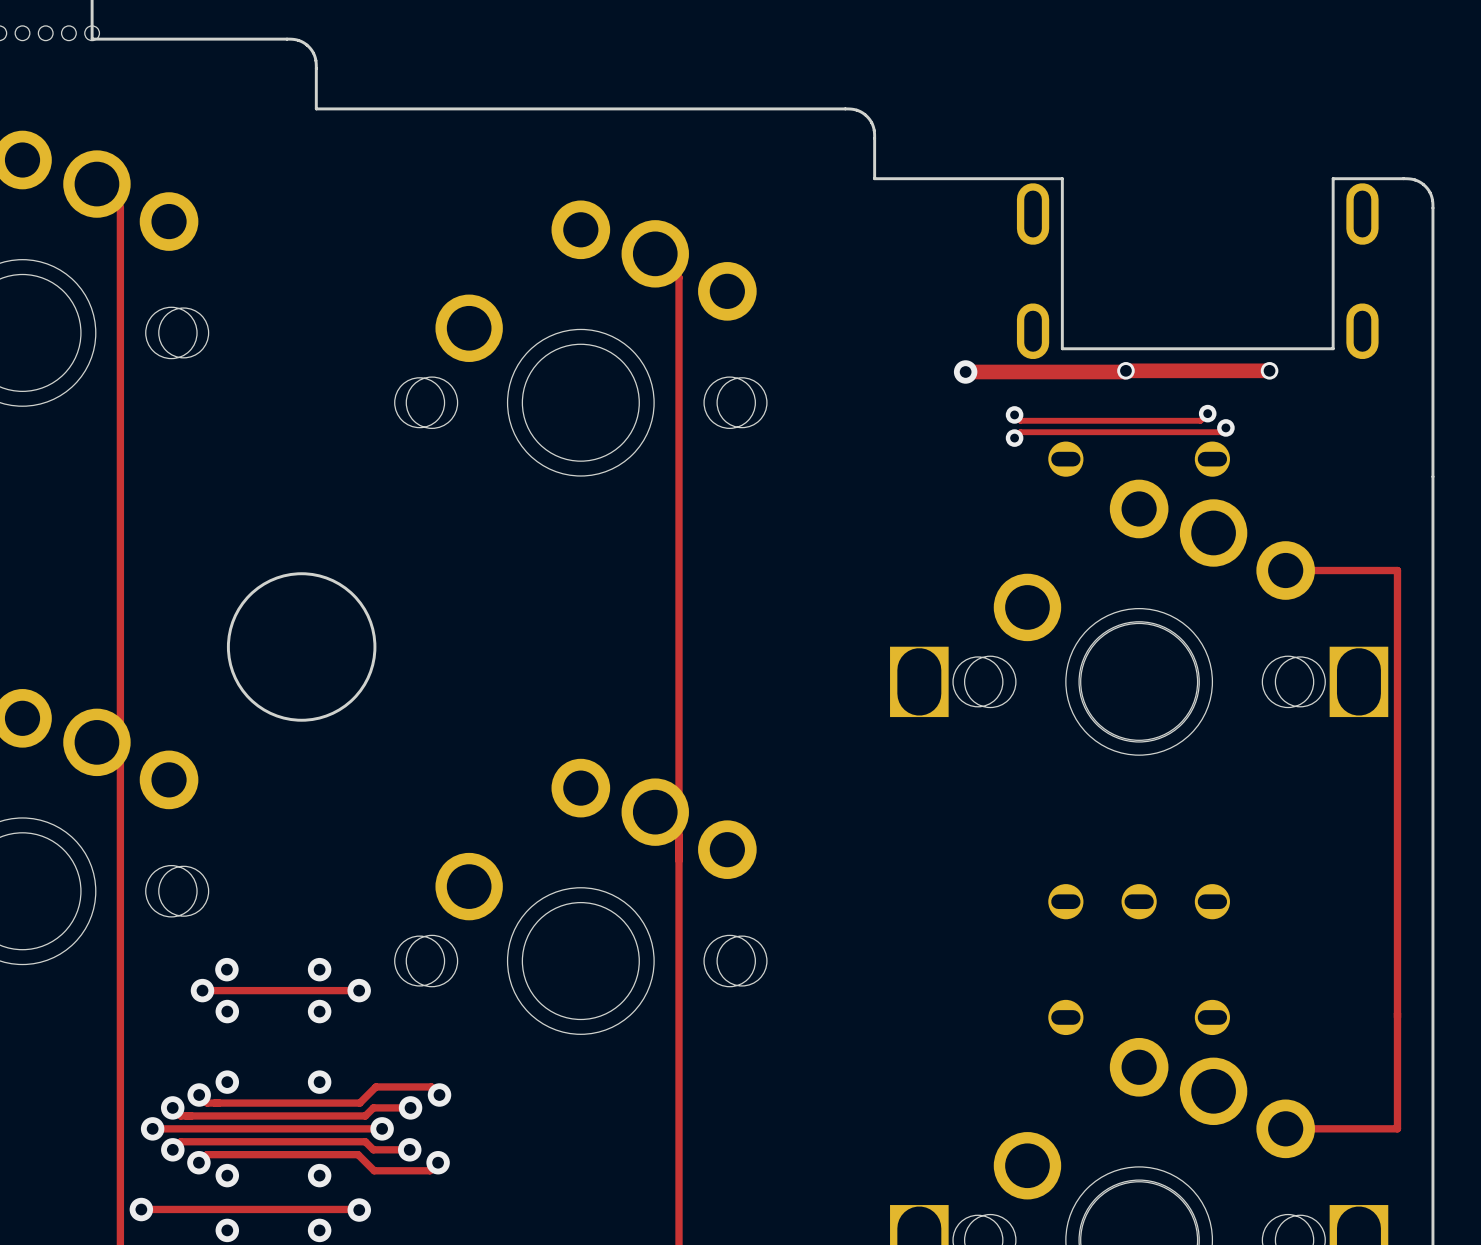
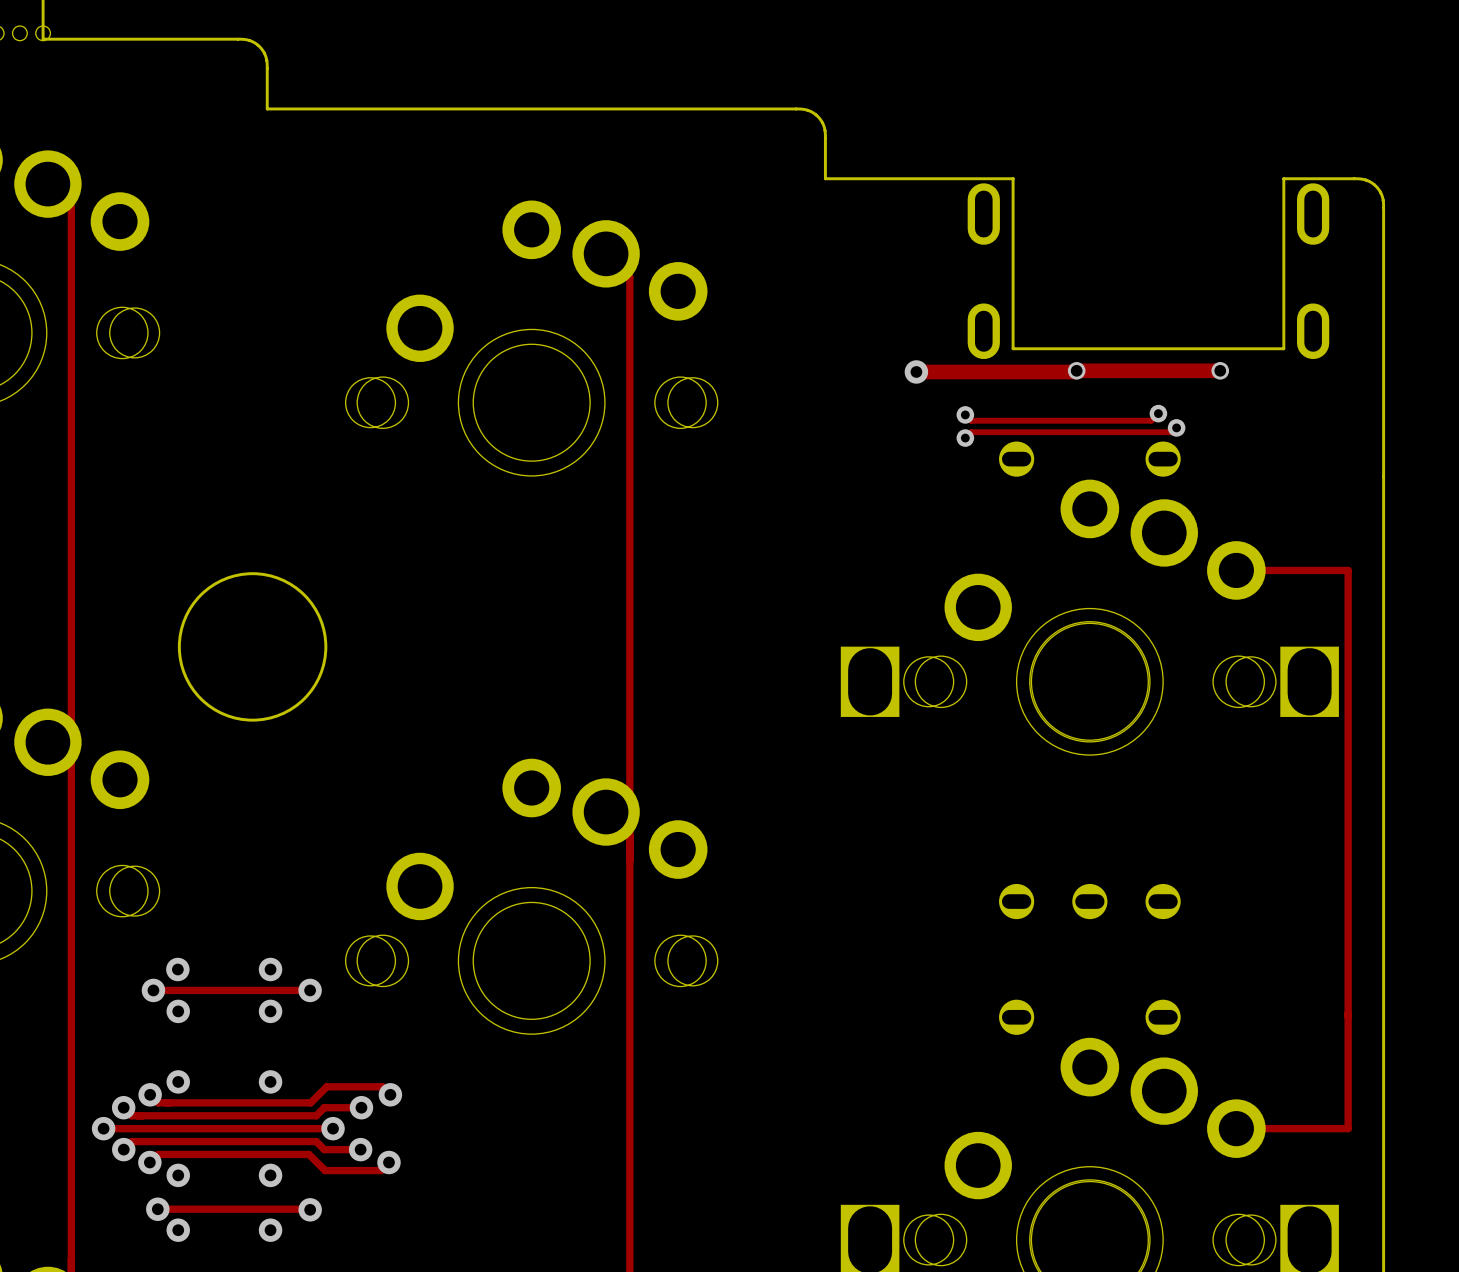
track: (141, 1209) (206, 1209) -> none
via position: (141, 1209) -> (157, 1209)

